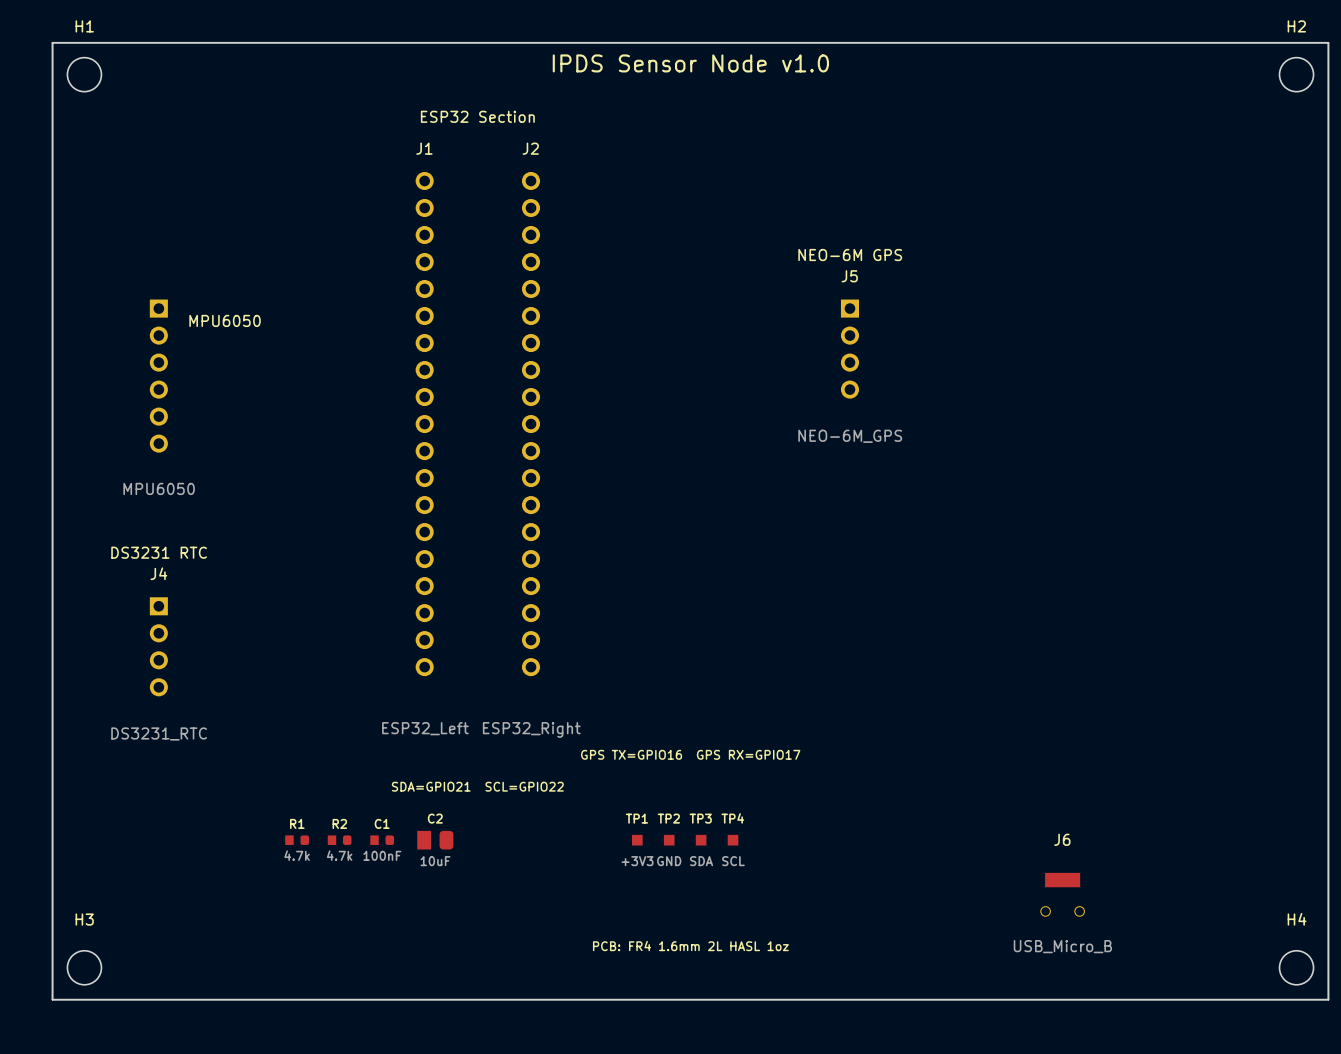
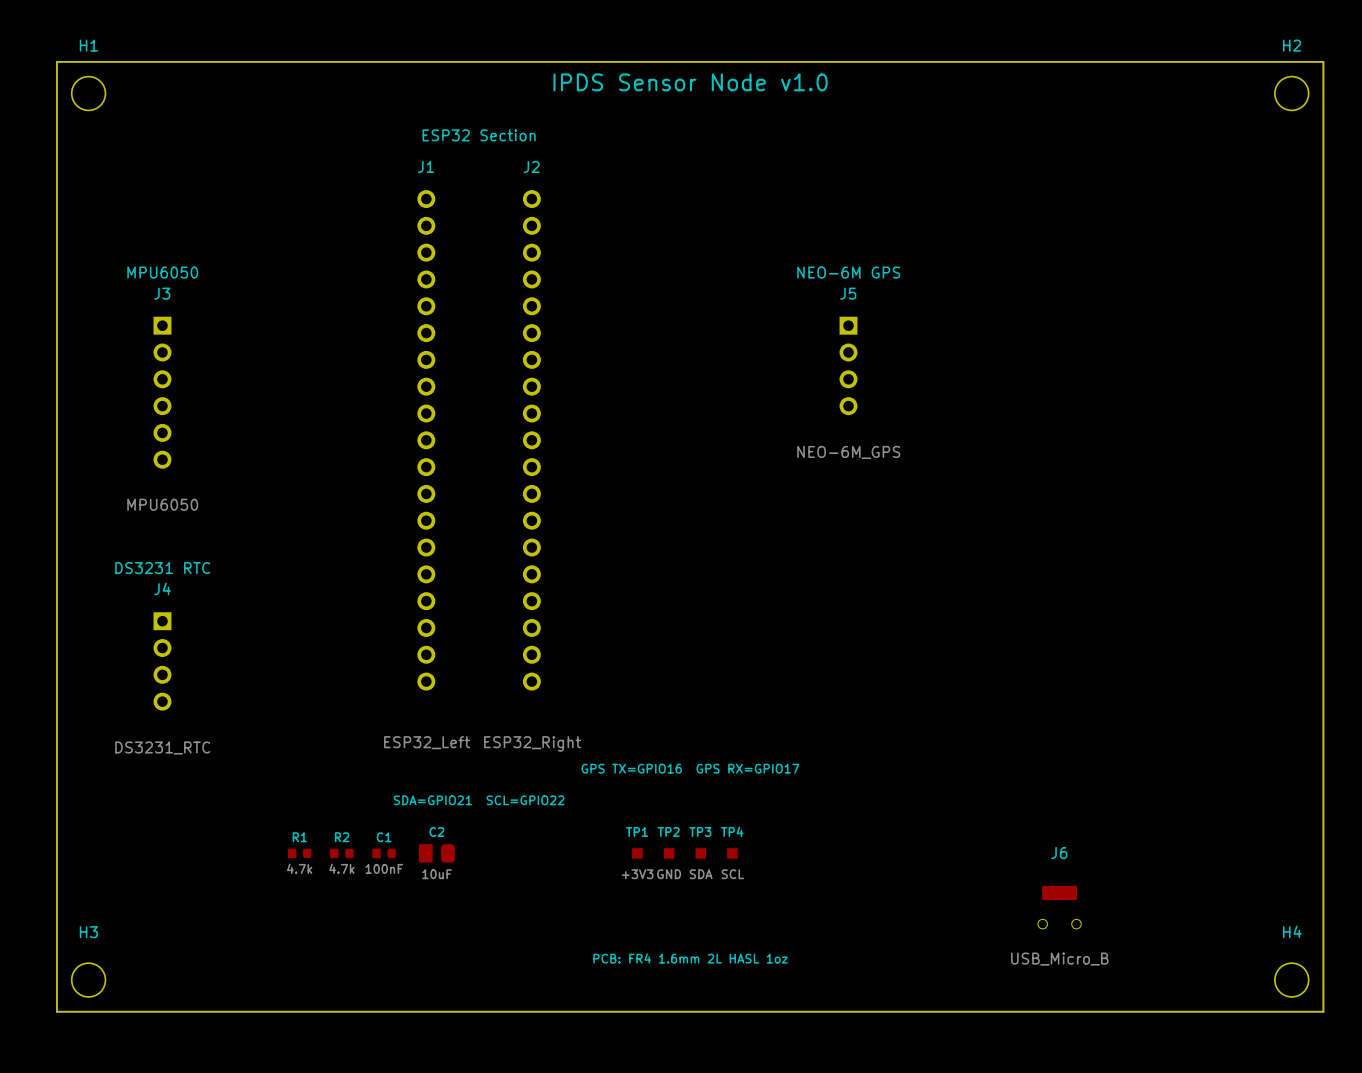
J3 name: none -> J3 (162, 293)
text position: MPU6050 (225, 320) -> MPU6050 (162, 272)

